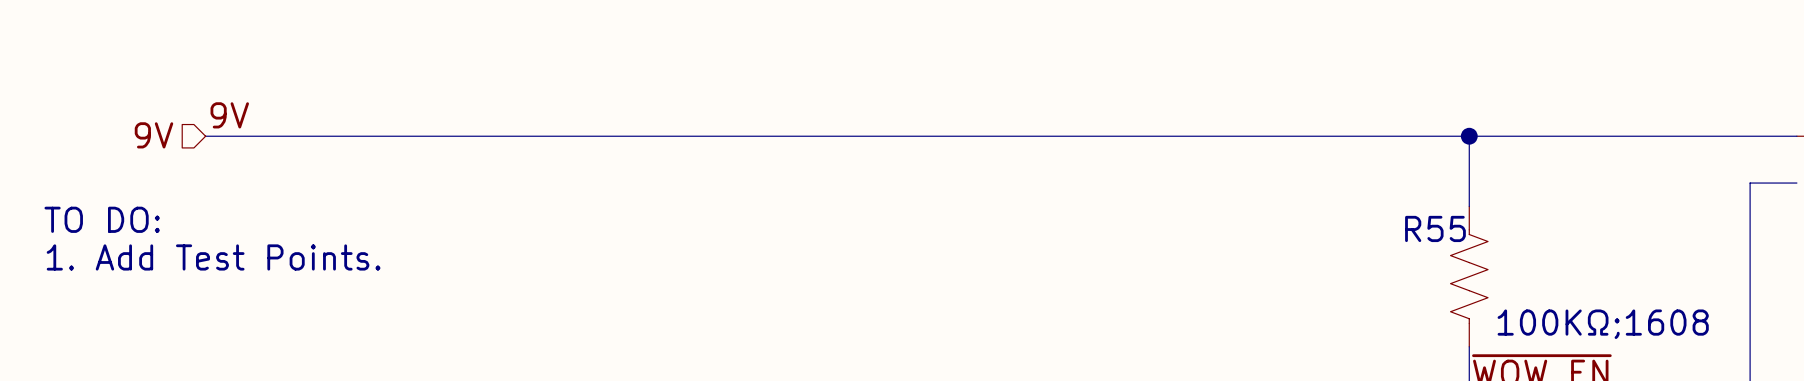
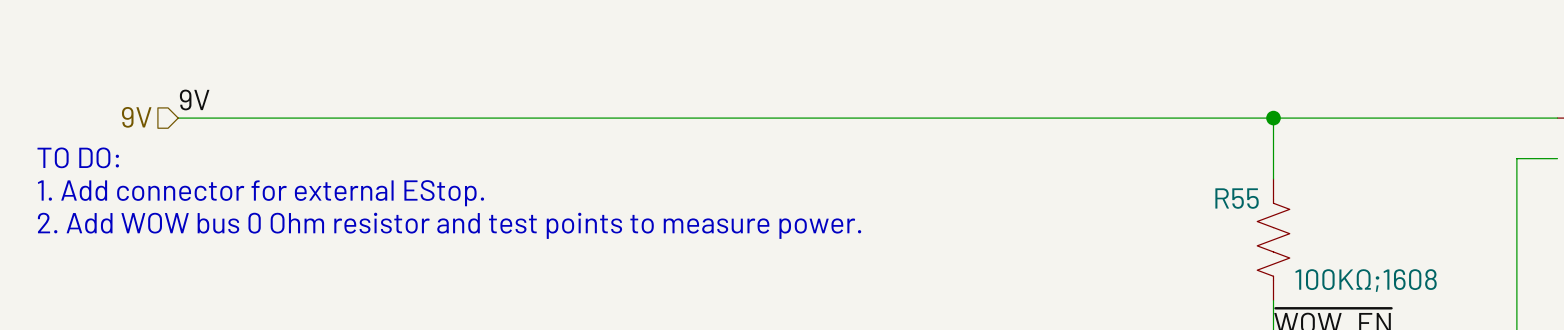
text: none -> TO DO: (78, 157)
text: TO DO: (102, 219) -> 1. Add connector for external EStop. (260, 193)
text: 1. Add Test Points. (213, 257) -> 2. Add WOW bus 0 Ohm resistor and test points to measure power. (449, 225)

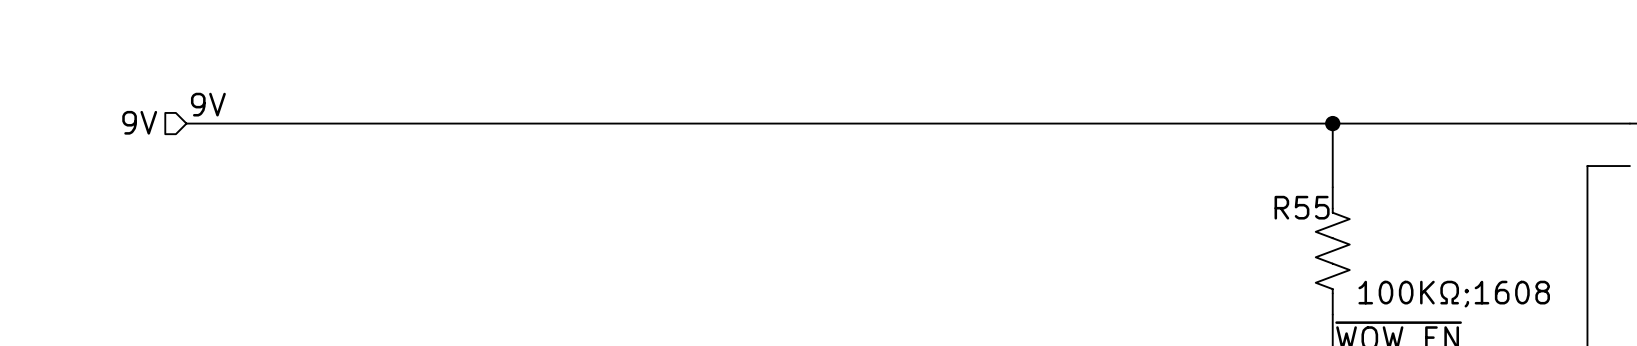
text: TO DO: (78, 157) -> none
text: 1. Add connector for external EStop. (260, 193) -> none
text: 2. Add WOW bus 0 Ohm resistor and test points to measure power. (449, 225) -> none

